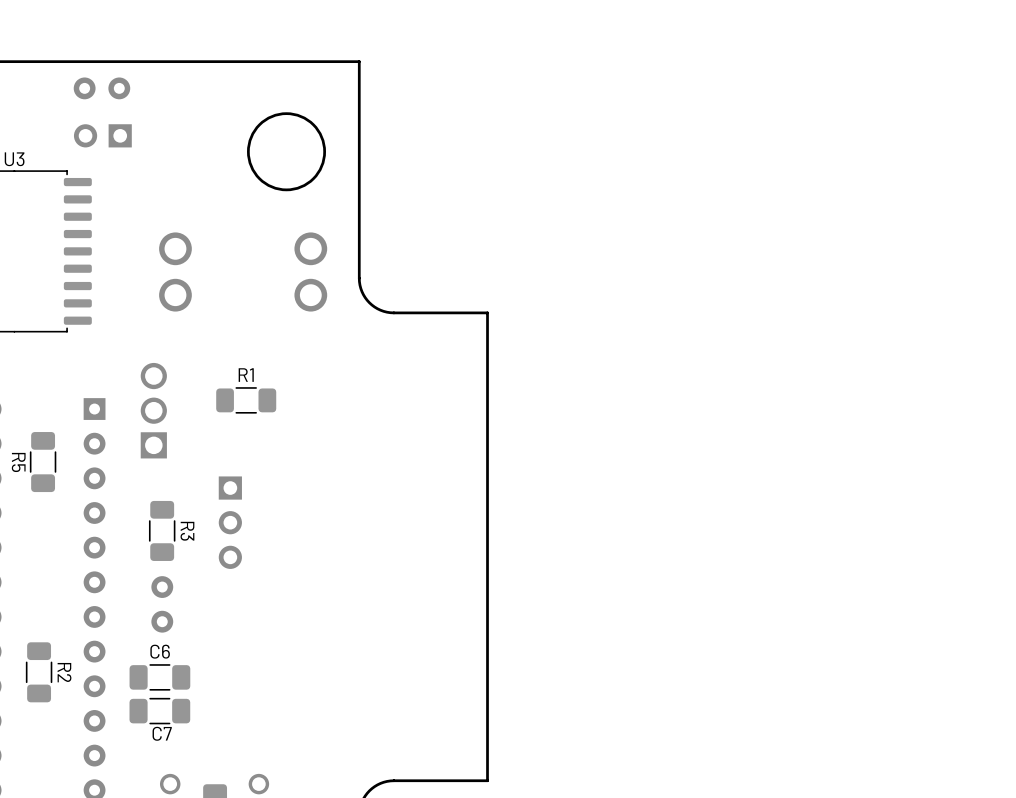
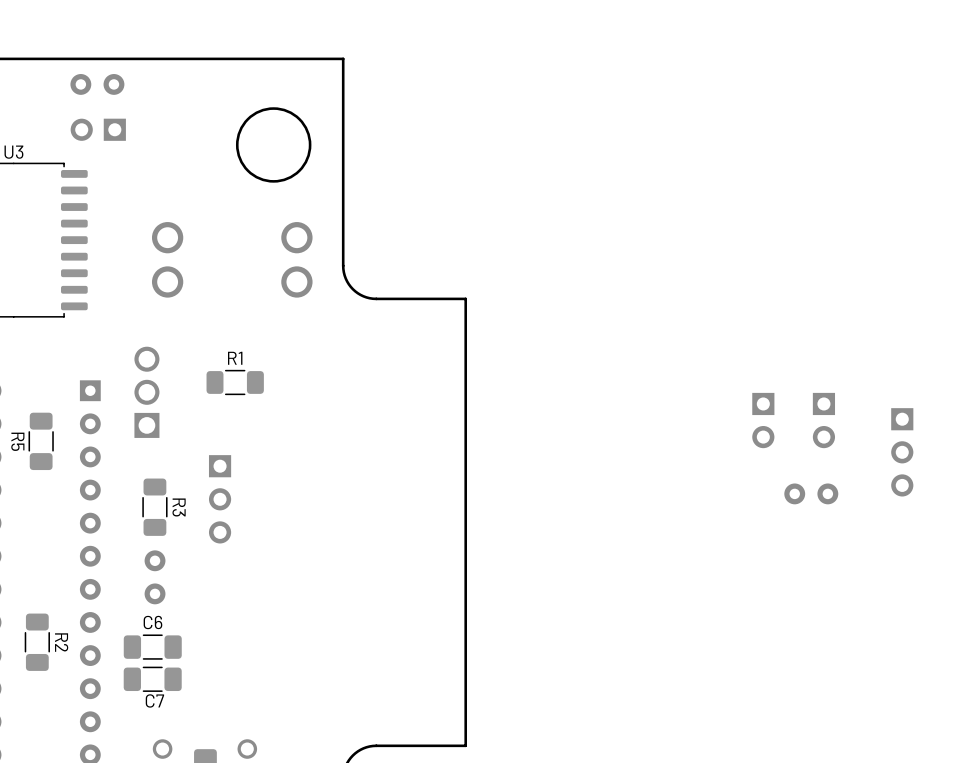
part: none -> (763, 420)
part: none -> (823, 420)
part: none -> (902, 452)
part: none -> (811, 493)

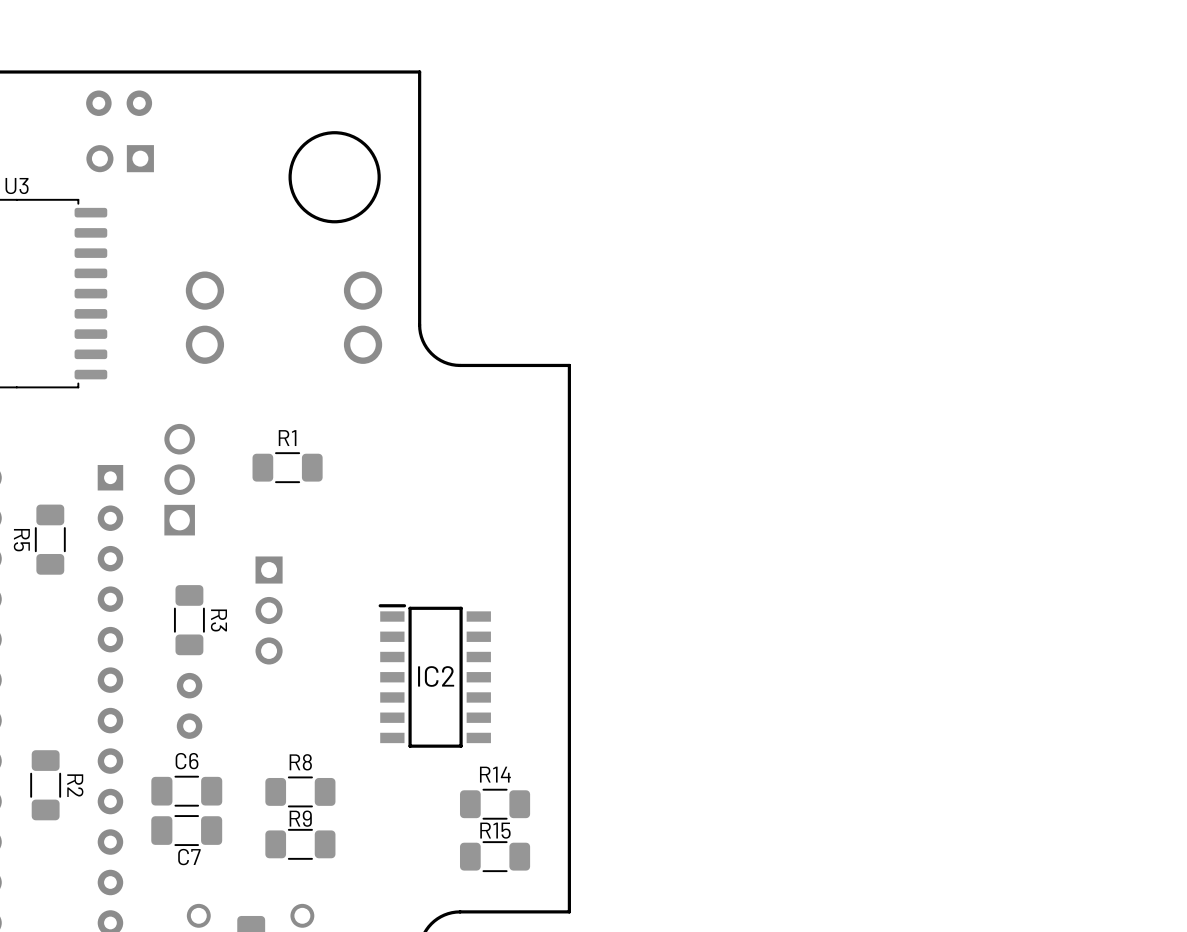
part: (763, 420) -> none
part: (823, 420) -> none
part: (902, 452) -> none
part: (811, 493) -> none
IC2: none -> (434, 675)
R8: none -> (300, 791)
R14: none -> (495, 804)
R9: none -> (300, 844)
R15: none -> (495, 856)

